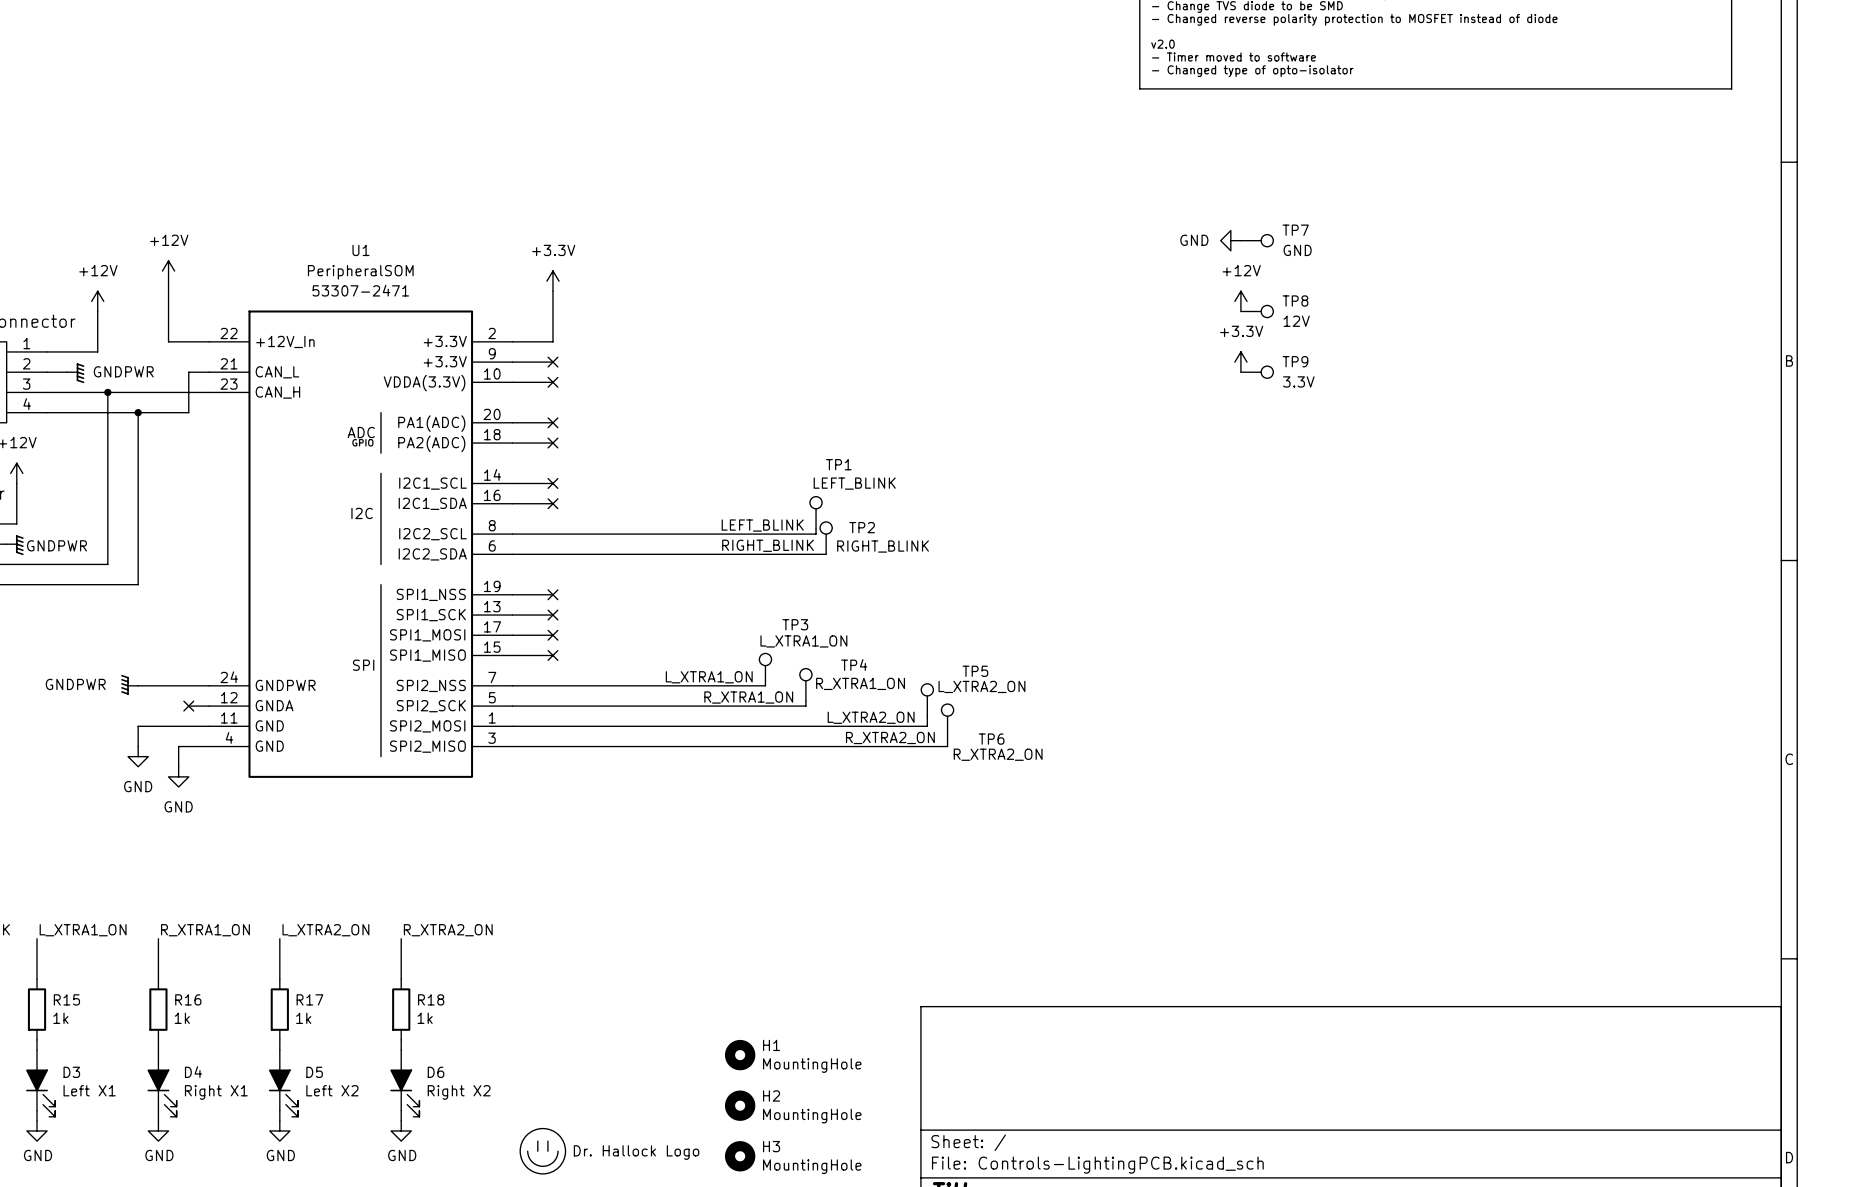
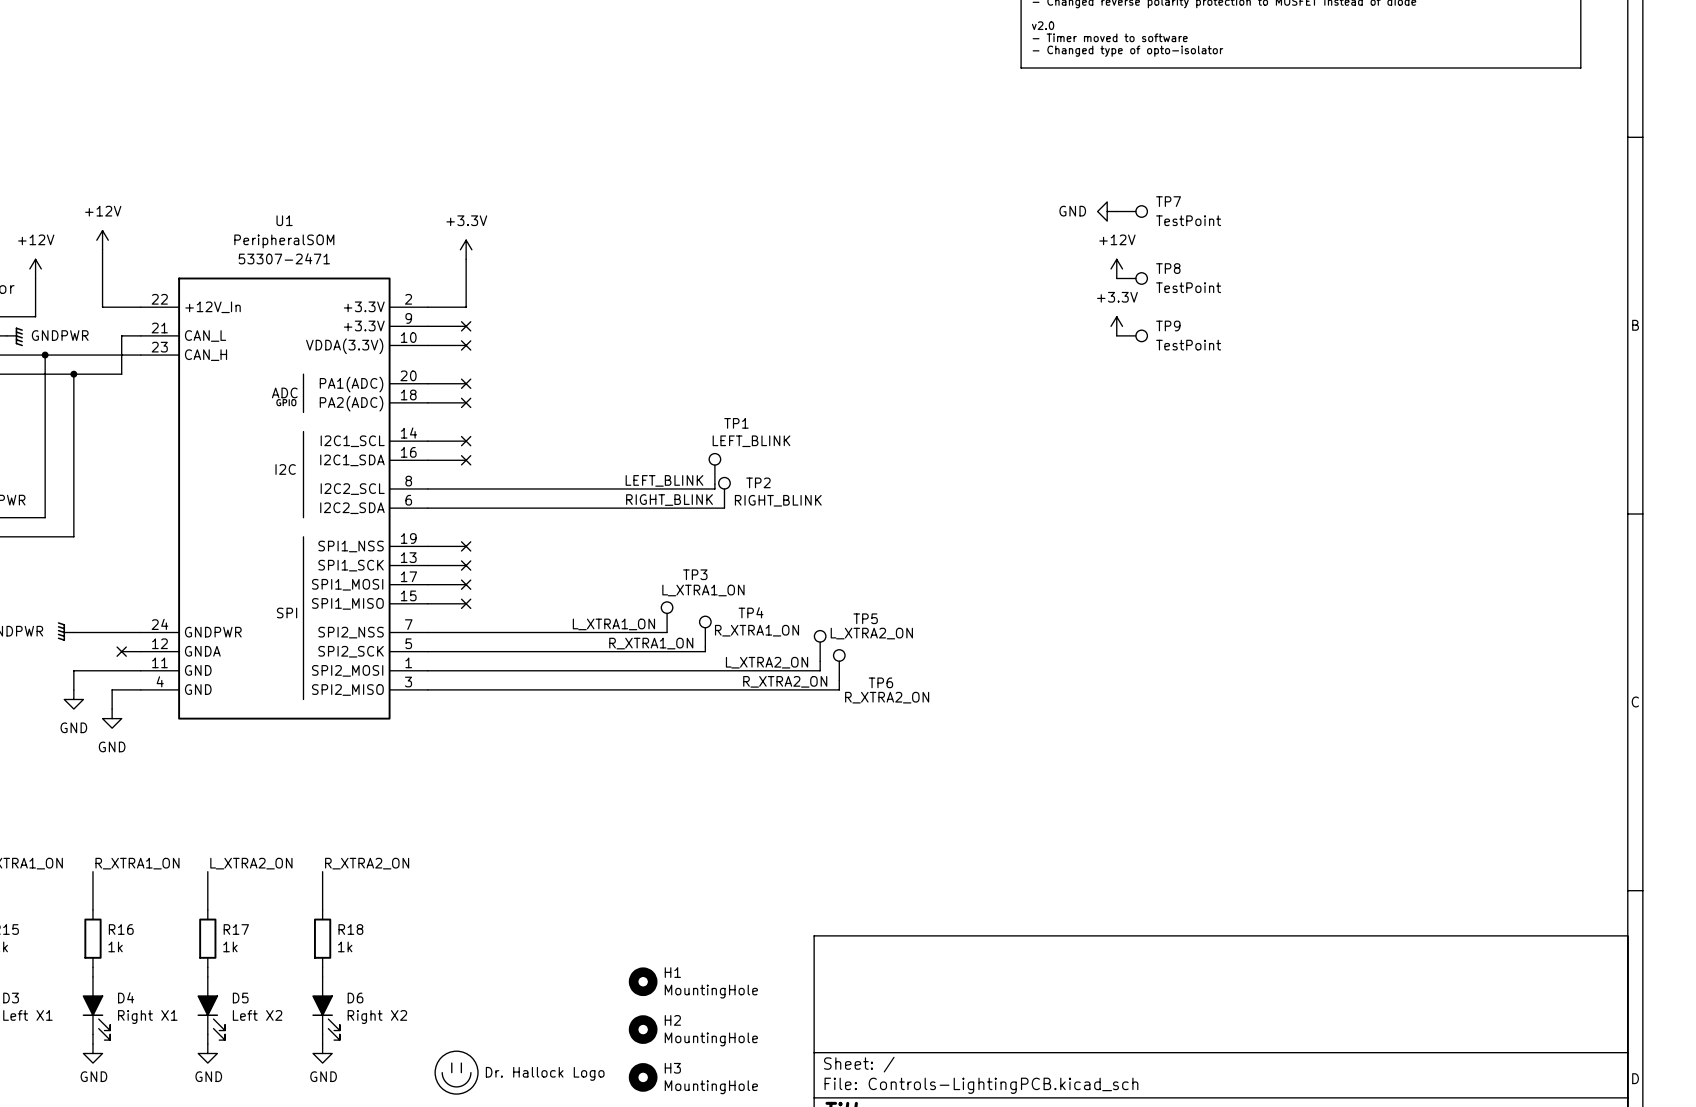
TP7 value: GND (1297, 250) -> TestPoint (1188, 220)
TP8 value: 12V (1296, 321) -> TestPoint (1188, 287)
TP9 value: 3.3V (1298, 381) -> TestPoint (1188, 345)

